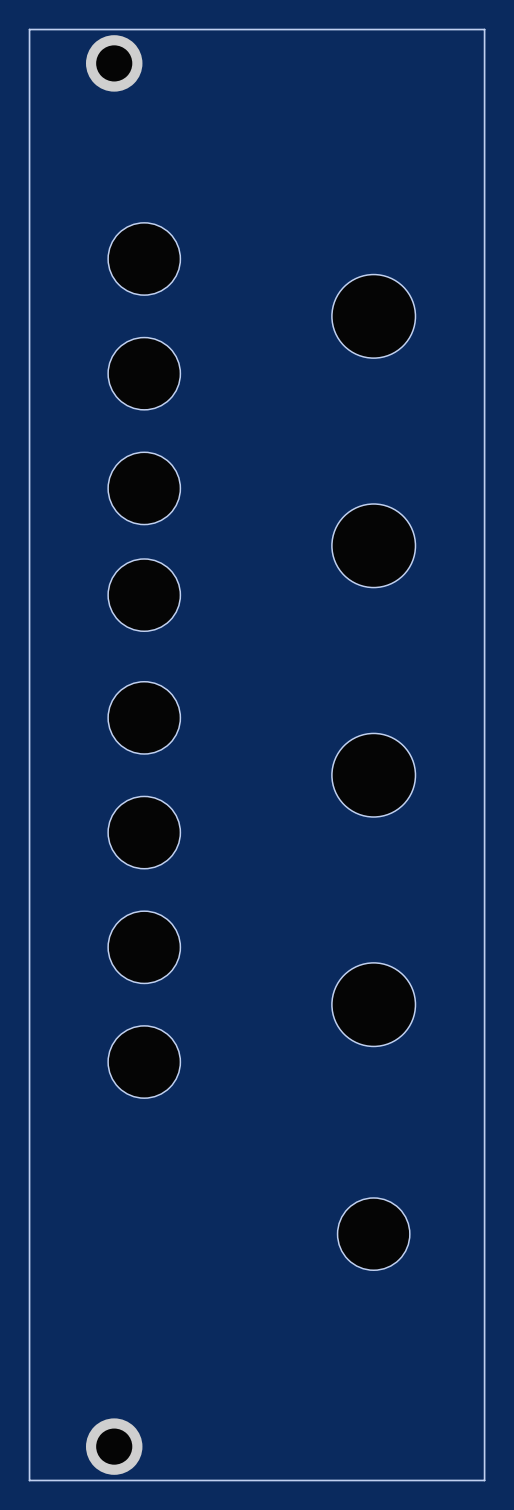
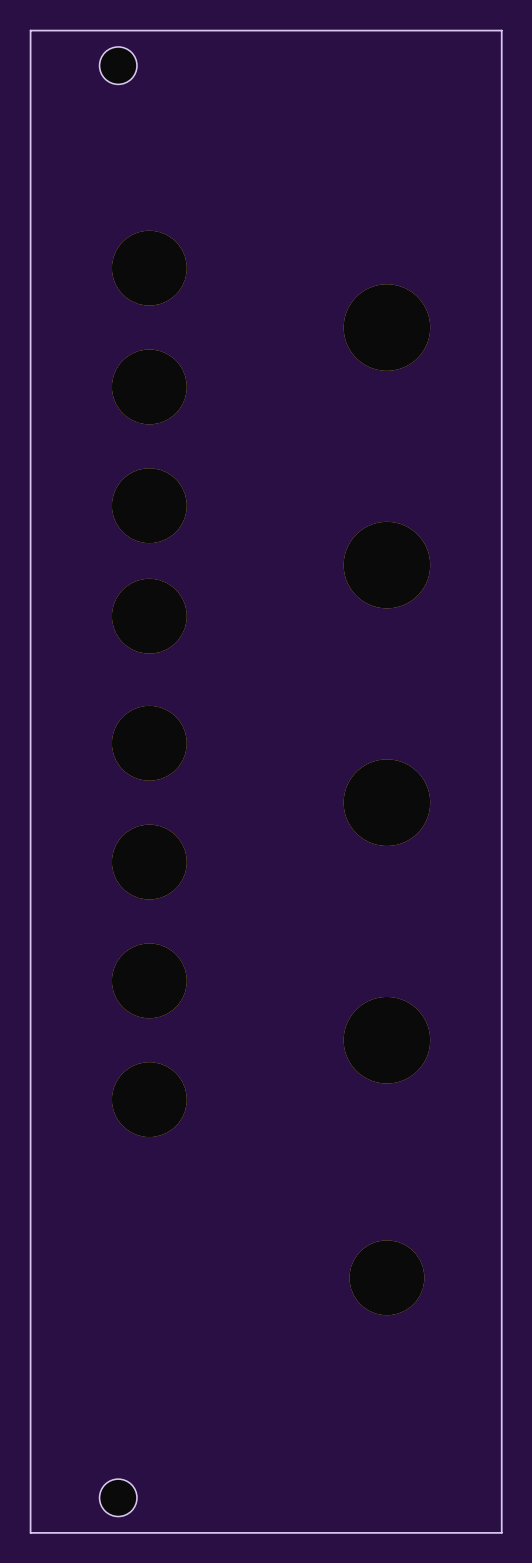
part footprint: [85, 35, 143, 92] -> [99, 46, 137, 85]
part footprint: [108, 222, 181, 296] -> [111, 230, 187, 306]
part footprint: [331, 274, 416, 359] -> [343, 284, 431, 371]
part footprint: [108, 337, 181, 410] -> [111, 349, 187, 425]
part footprint: [108, 452, 181, 525] -> [111, 468, 187, 544]
part footprint: [331, 504, 416, 588] -> [343, 521, 431, 609]
part footprint: [108, 558, 181, 632] -> [111, 578, 187, 654]
part footprint: [108, 681, 181, 754] -> [111, 705, 187, 781]
part footprint: [331, 733, 416, 818] -> [343, 759, 431, 846]
part footprint: [108, 796, 181, 869] -> [111, 824, 187, 900]
part footprint: [108, 911, 181, 984] -> [111, 943, 187, 1019]
part footprint: [331, 962, 416, 1047] -> [343, 996, 431, 1084]
part footprint: [108, 1025, 181, 1099] -> [111, 1062, 187, 1138]
part footprint: [337, 1197, 410, 1271] -> [349, 1240, 425, 1316]
part footprint: [85, 1418, 143, 1475] -> [99, 1479, 137, 1517]

